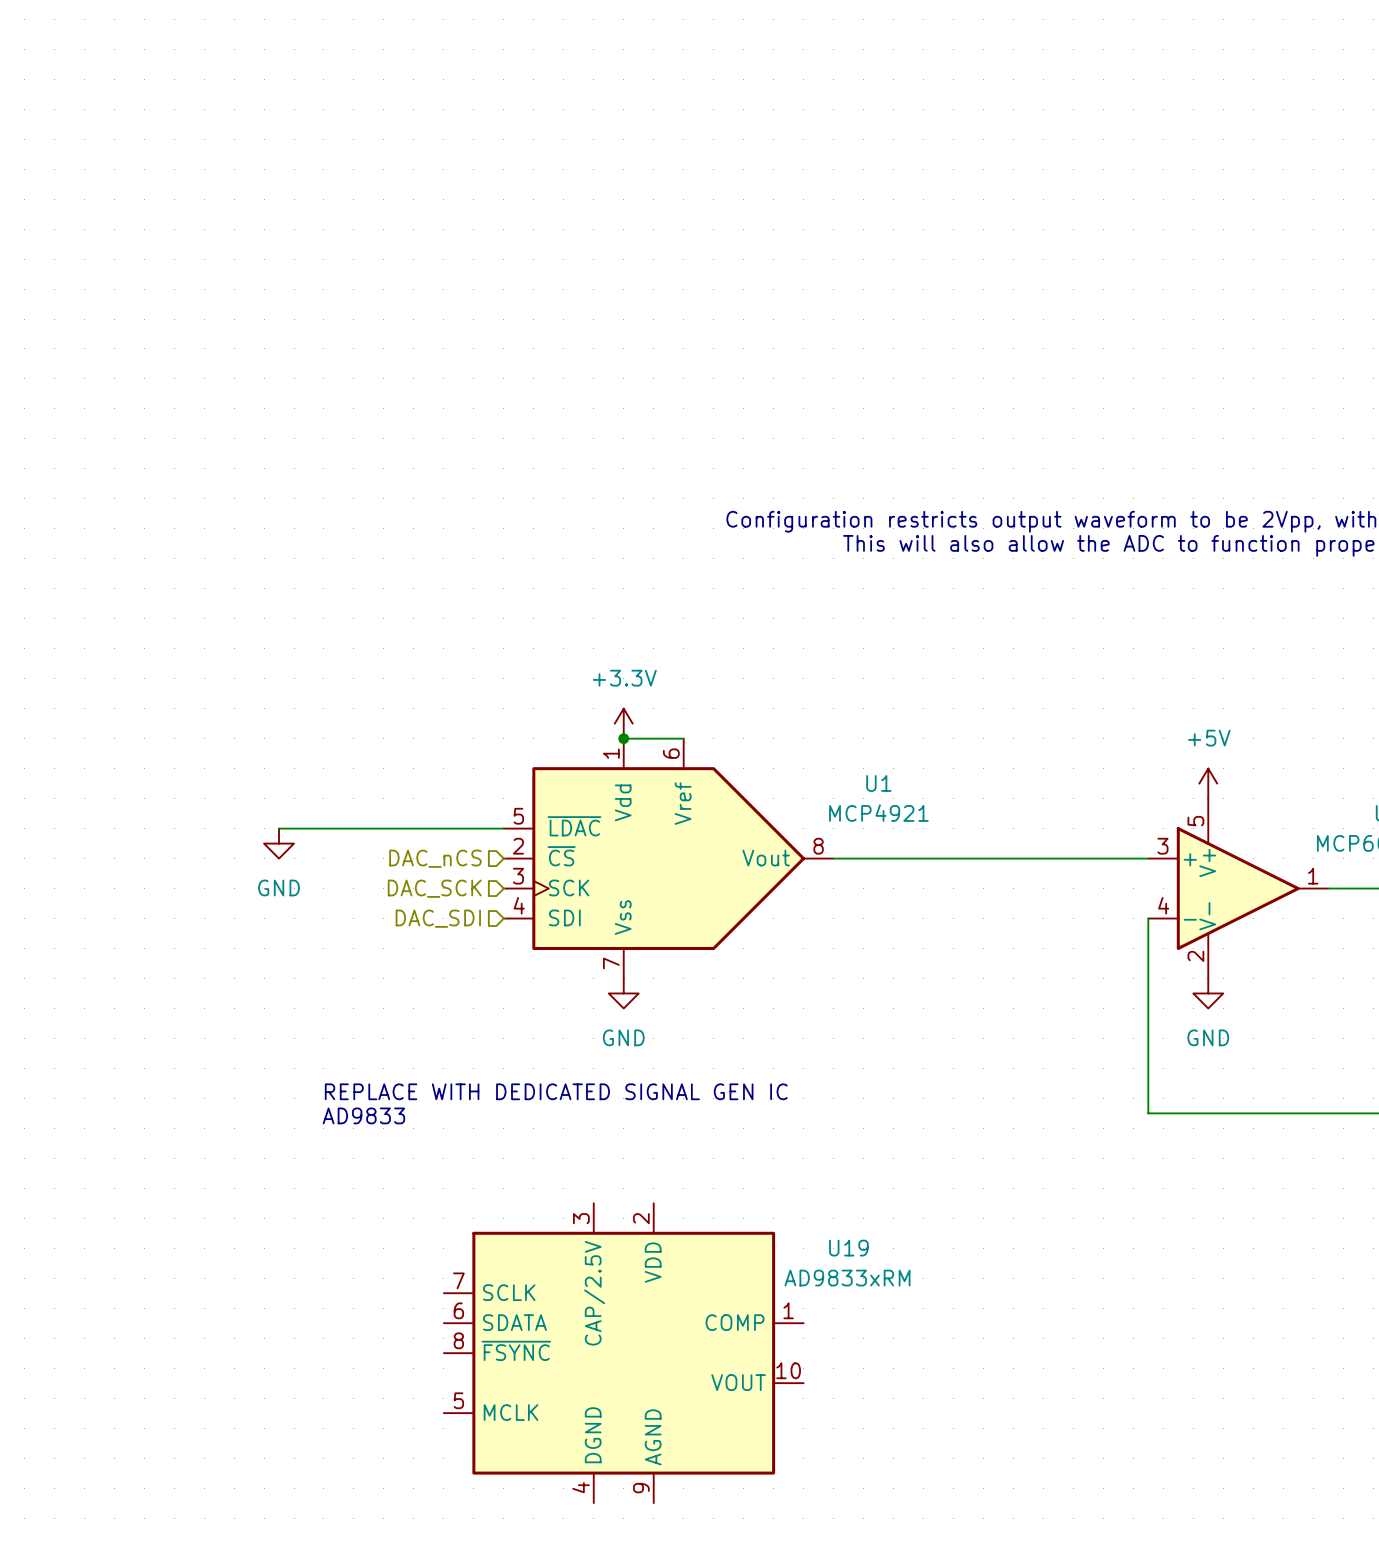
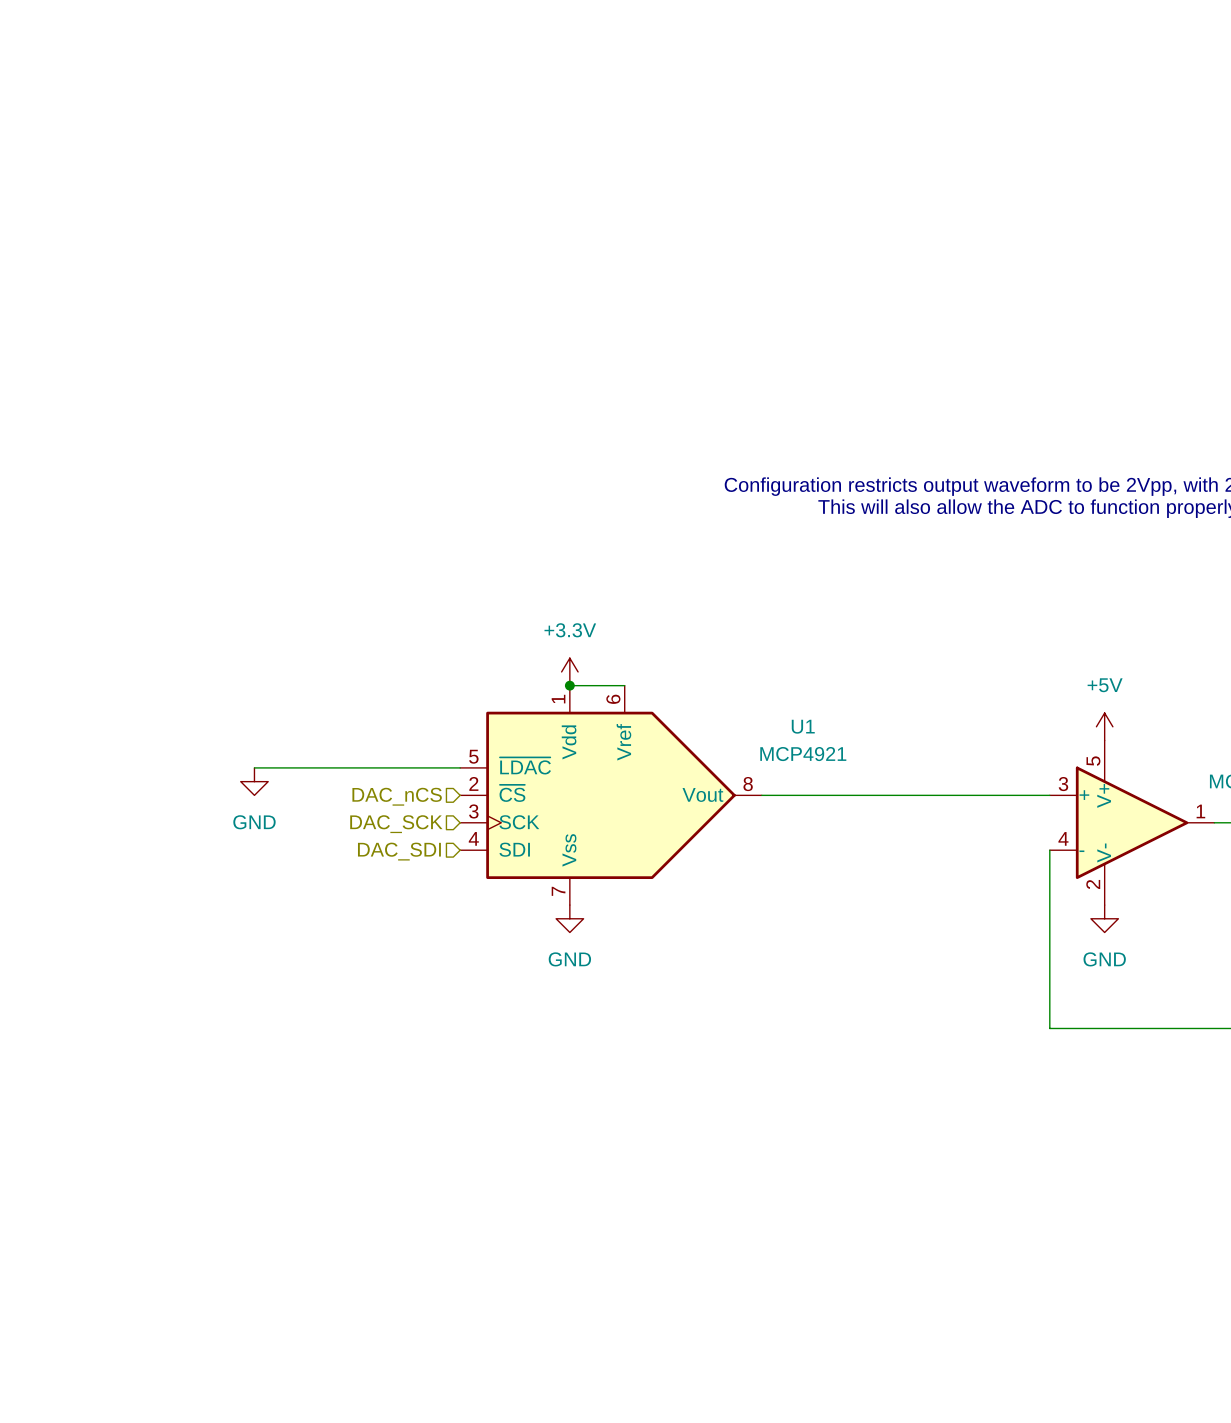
text: REPLACE WITH DEDICATED SIGNAL GEN IC (556, 1091) -> none
text: AD9833 (363, 1115) -> none
U19: AD9833xRM (623, 1353) -> none

